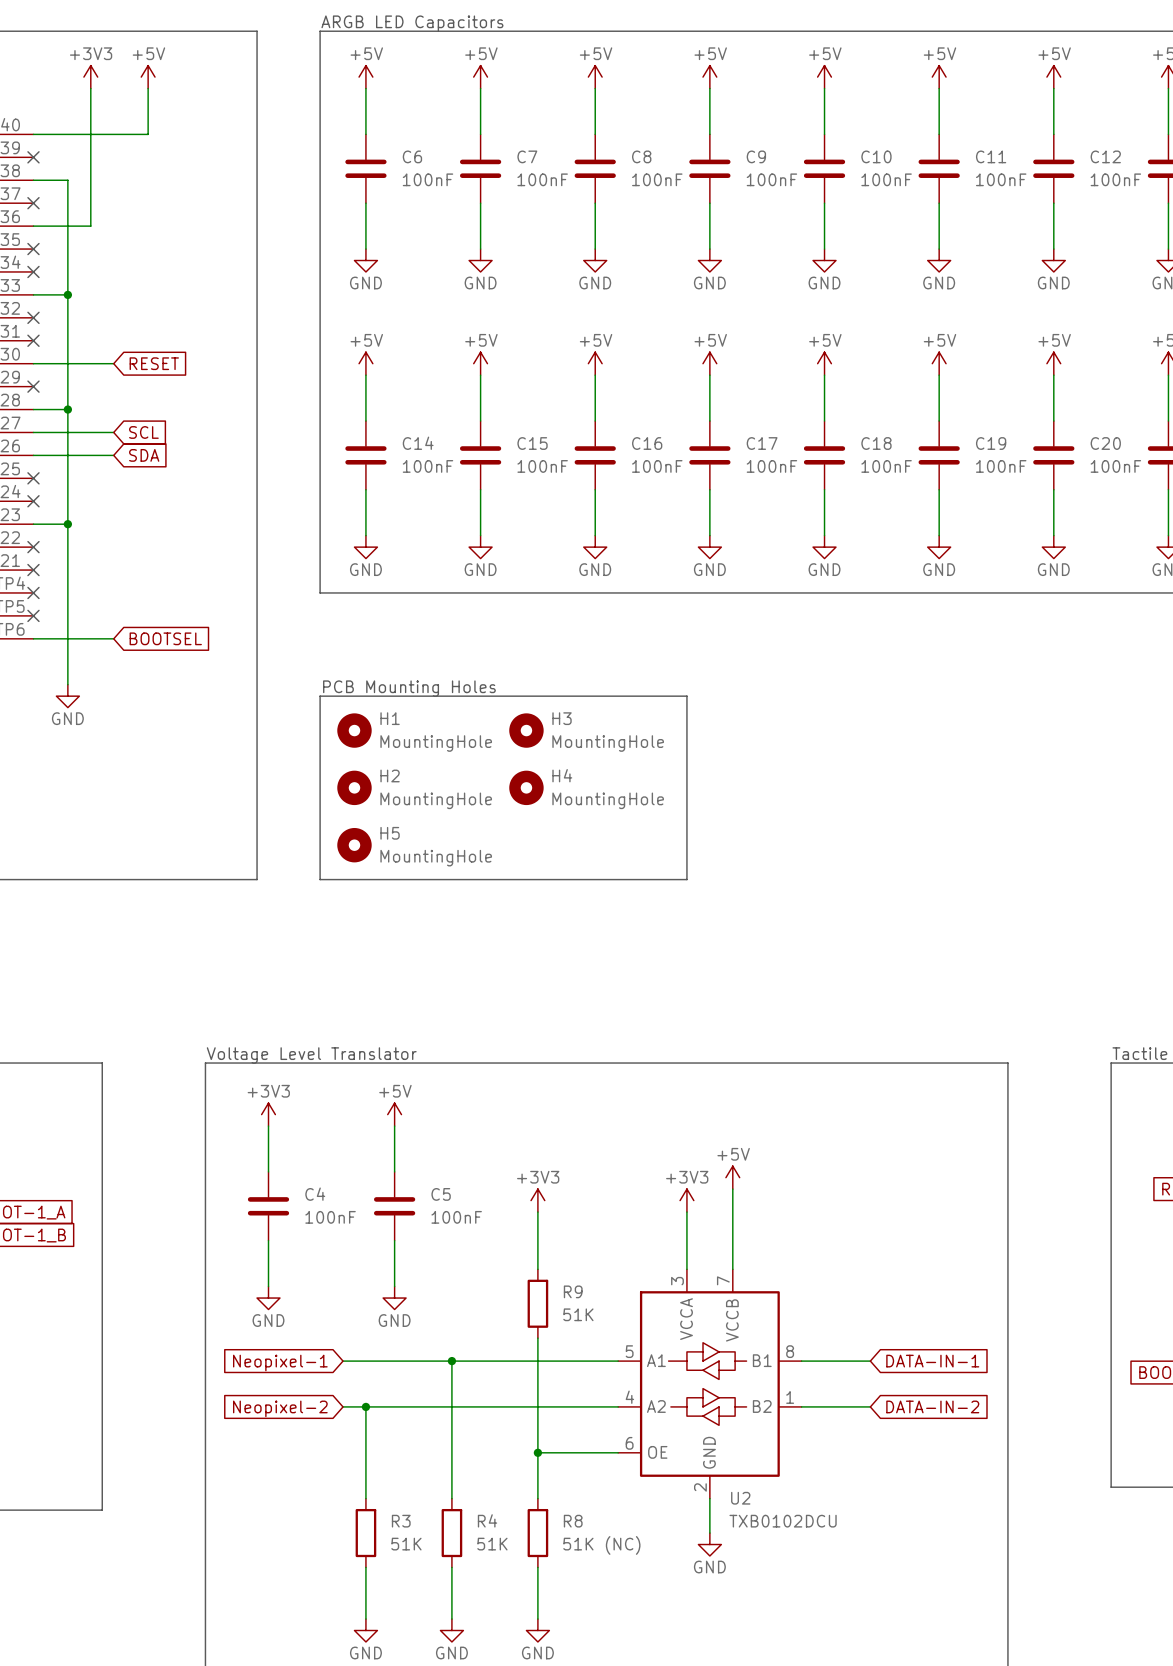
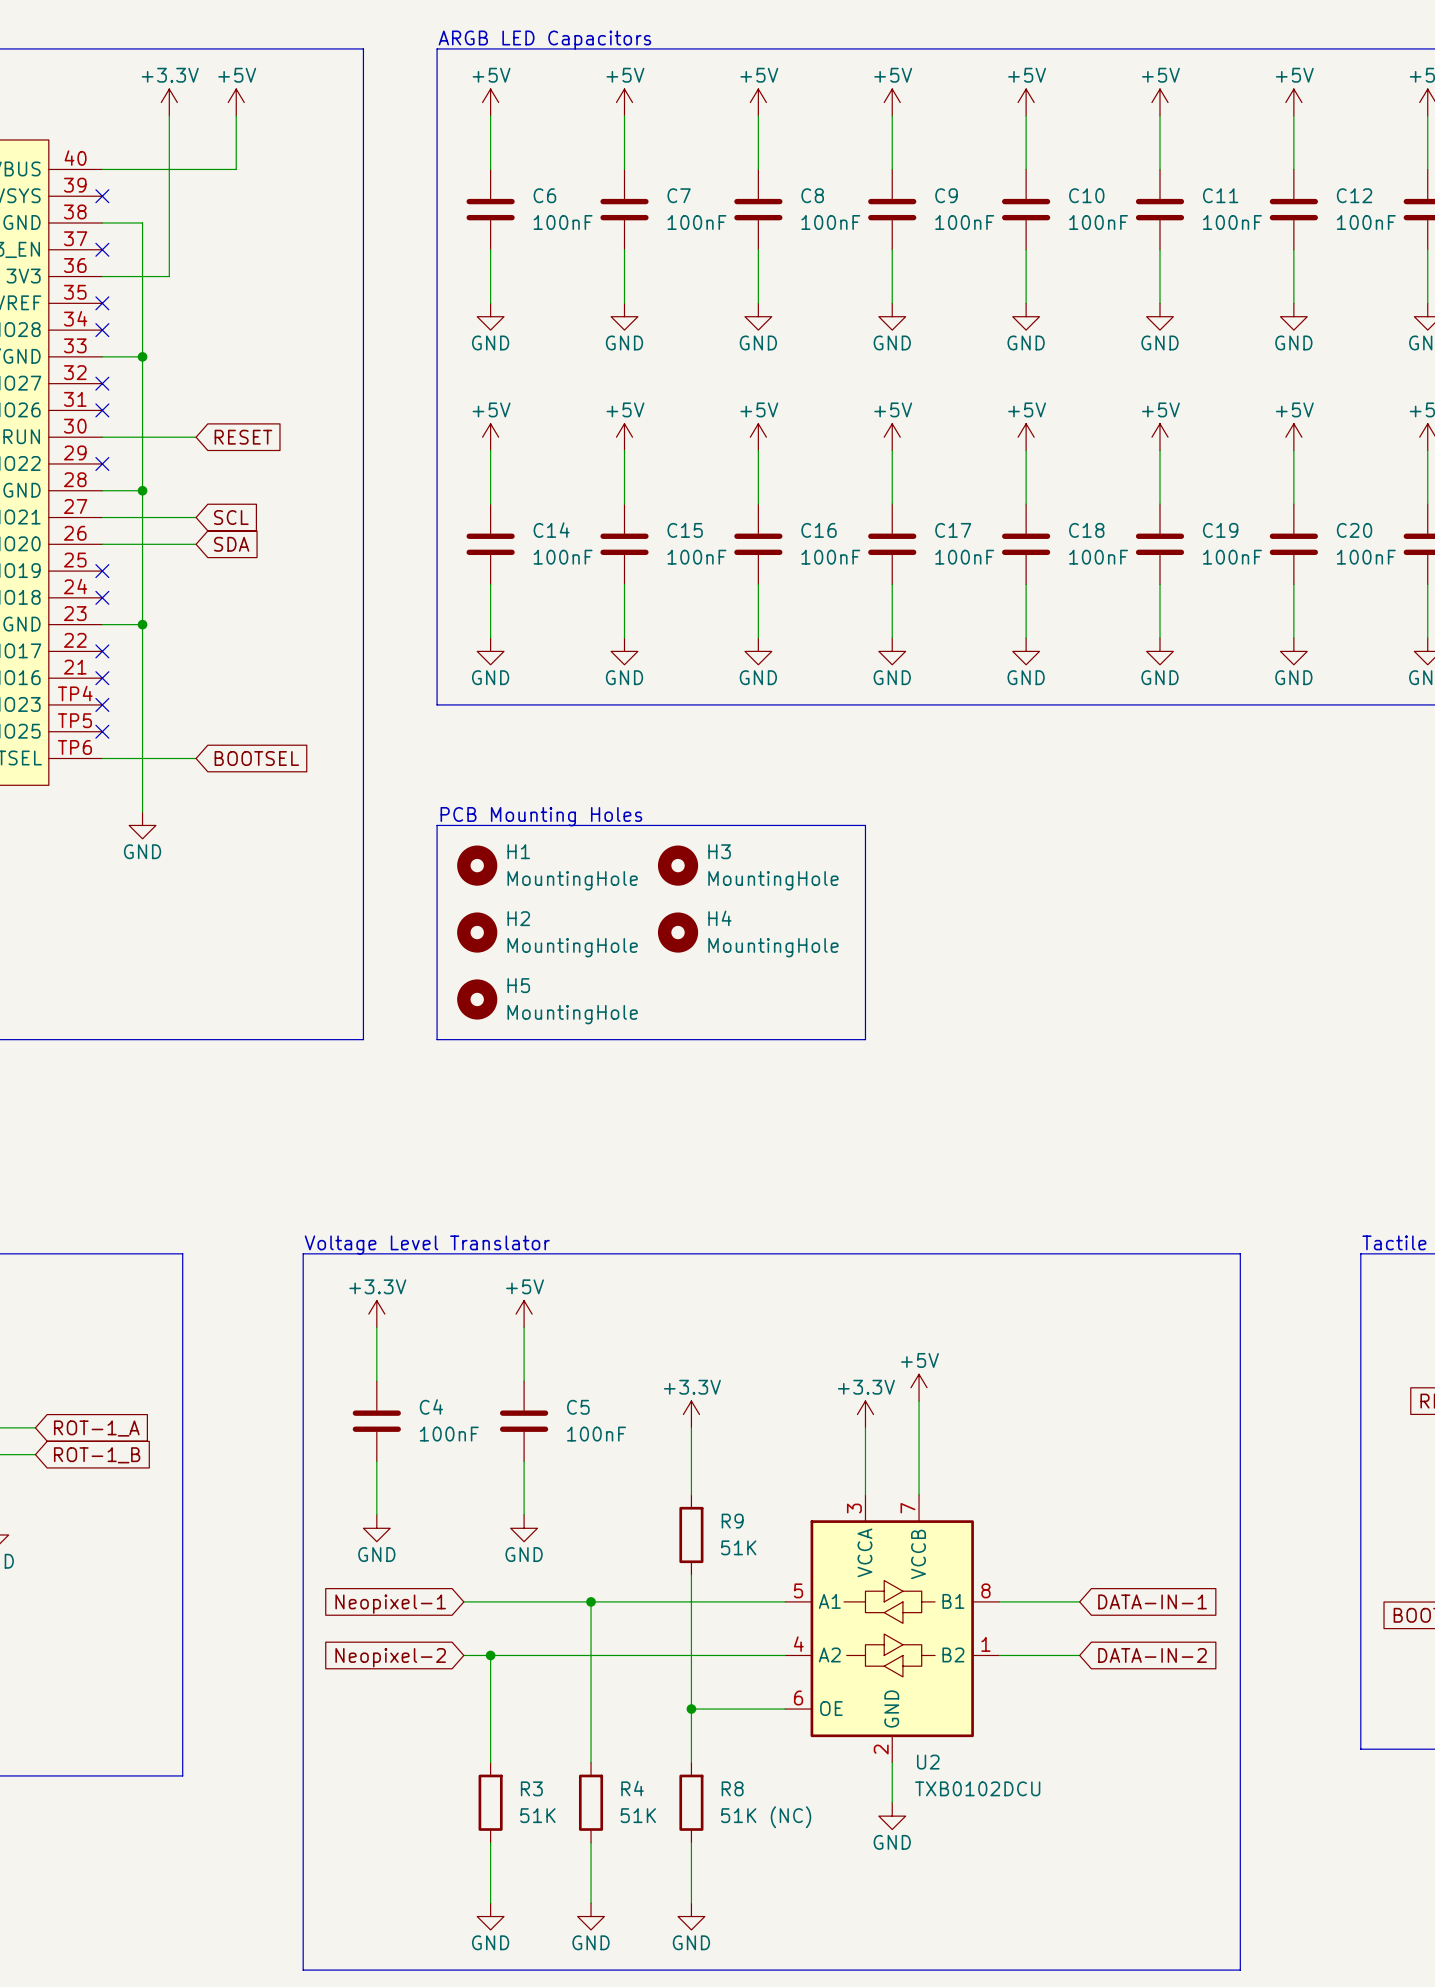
power symbol: +3V3 (90, 77) -> +3.3V (169, 102)
power symbol: +3V3 (268, 1114) -> +3.3V (376, 1314)
power symbol: +3V3 (537, 1200) -> +3.3V (691, 1414)
power symbol: +3V3 (686, 1200) -> +3.3V (865, 1414)

